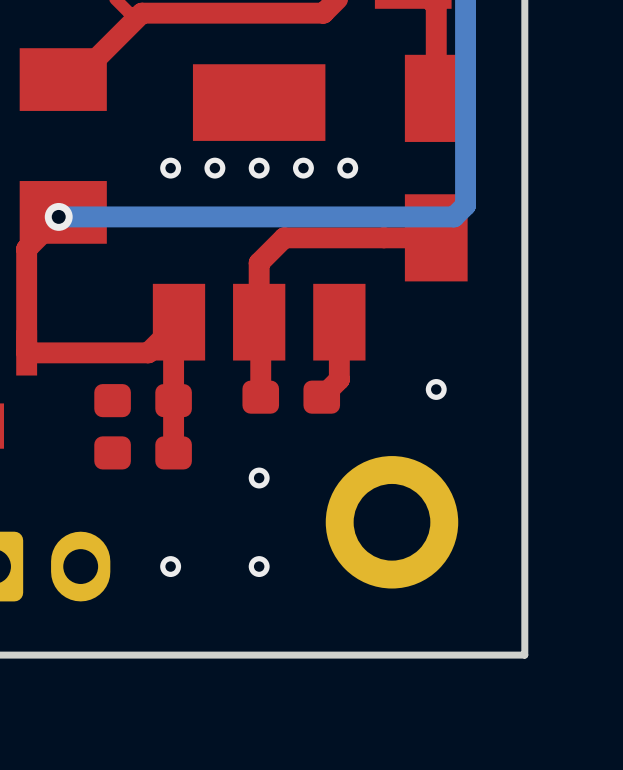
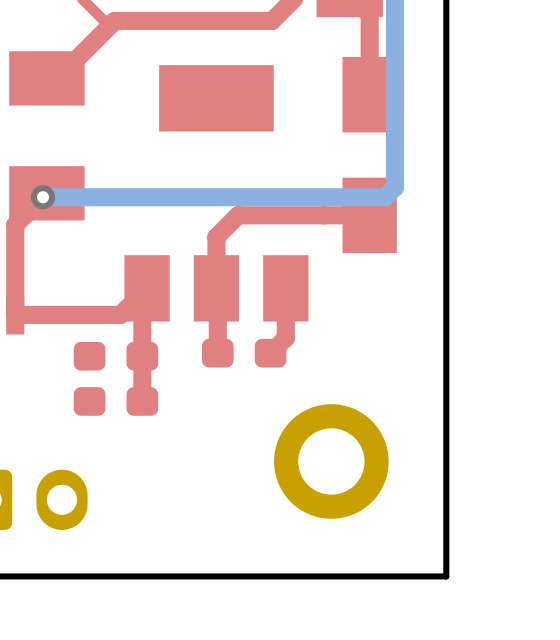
via: (170, 168) -> none
via: (214, 168) -> none
via: (259, 168) -> none
via: (303, 168) -> none
via: (347, 168) -> none
via: (436, 389) -> none
via: (259, 478) -> none
via: (170, 566) -> none
via: (259, 566) -> none

